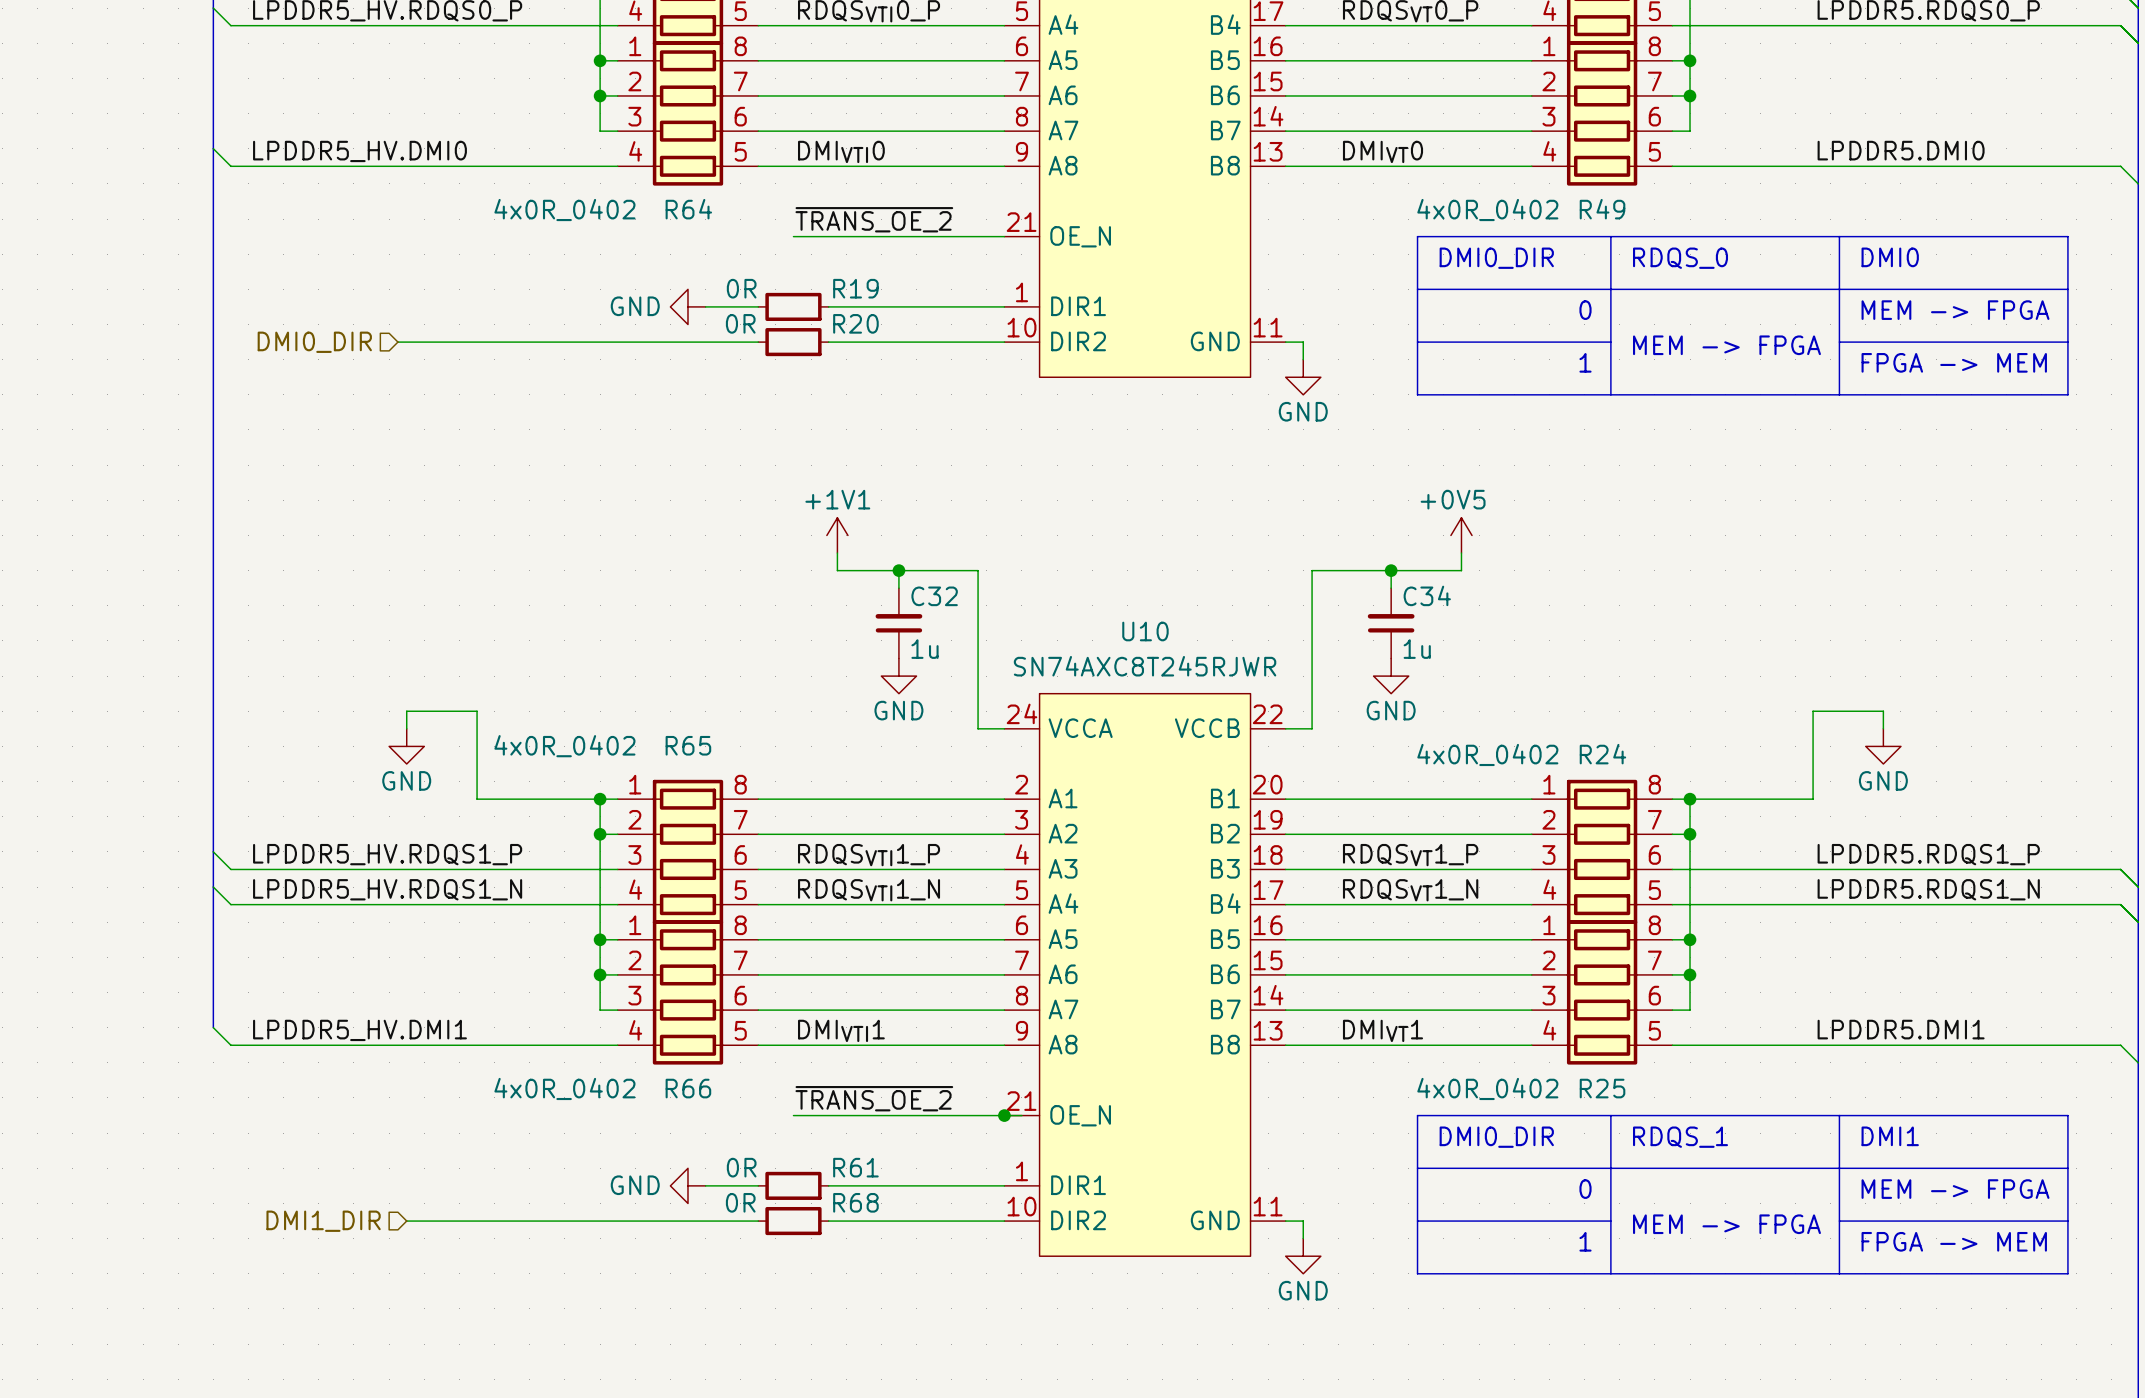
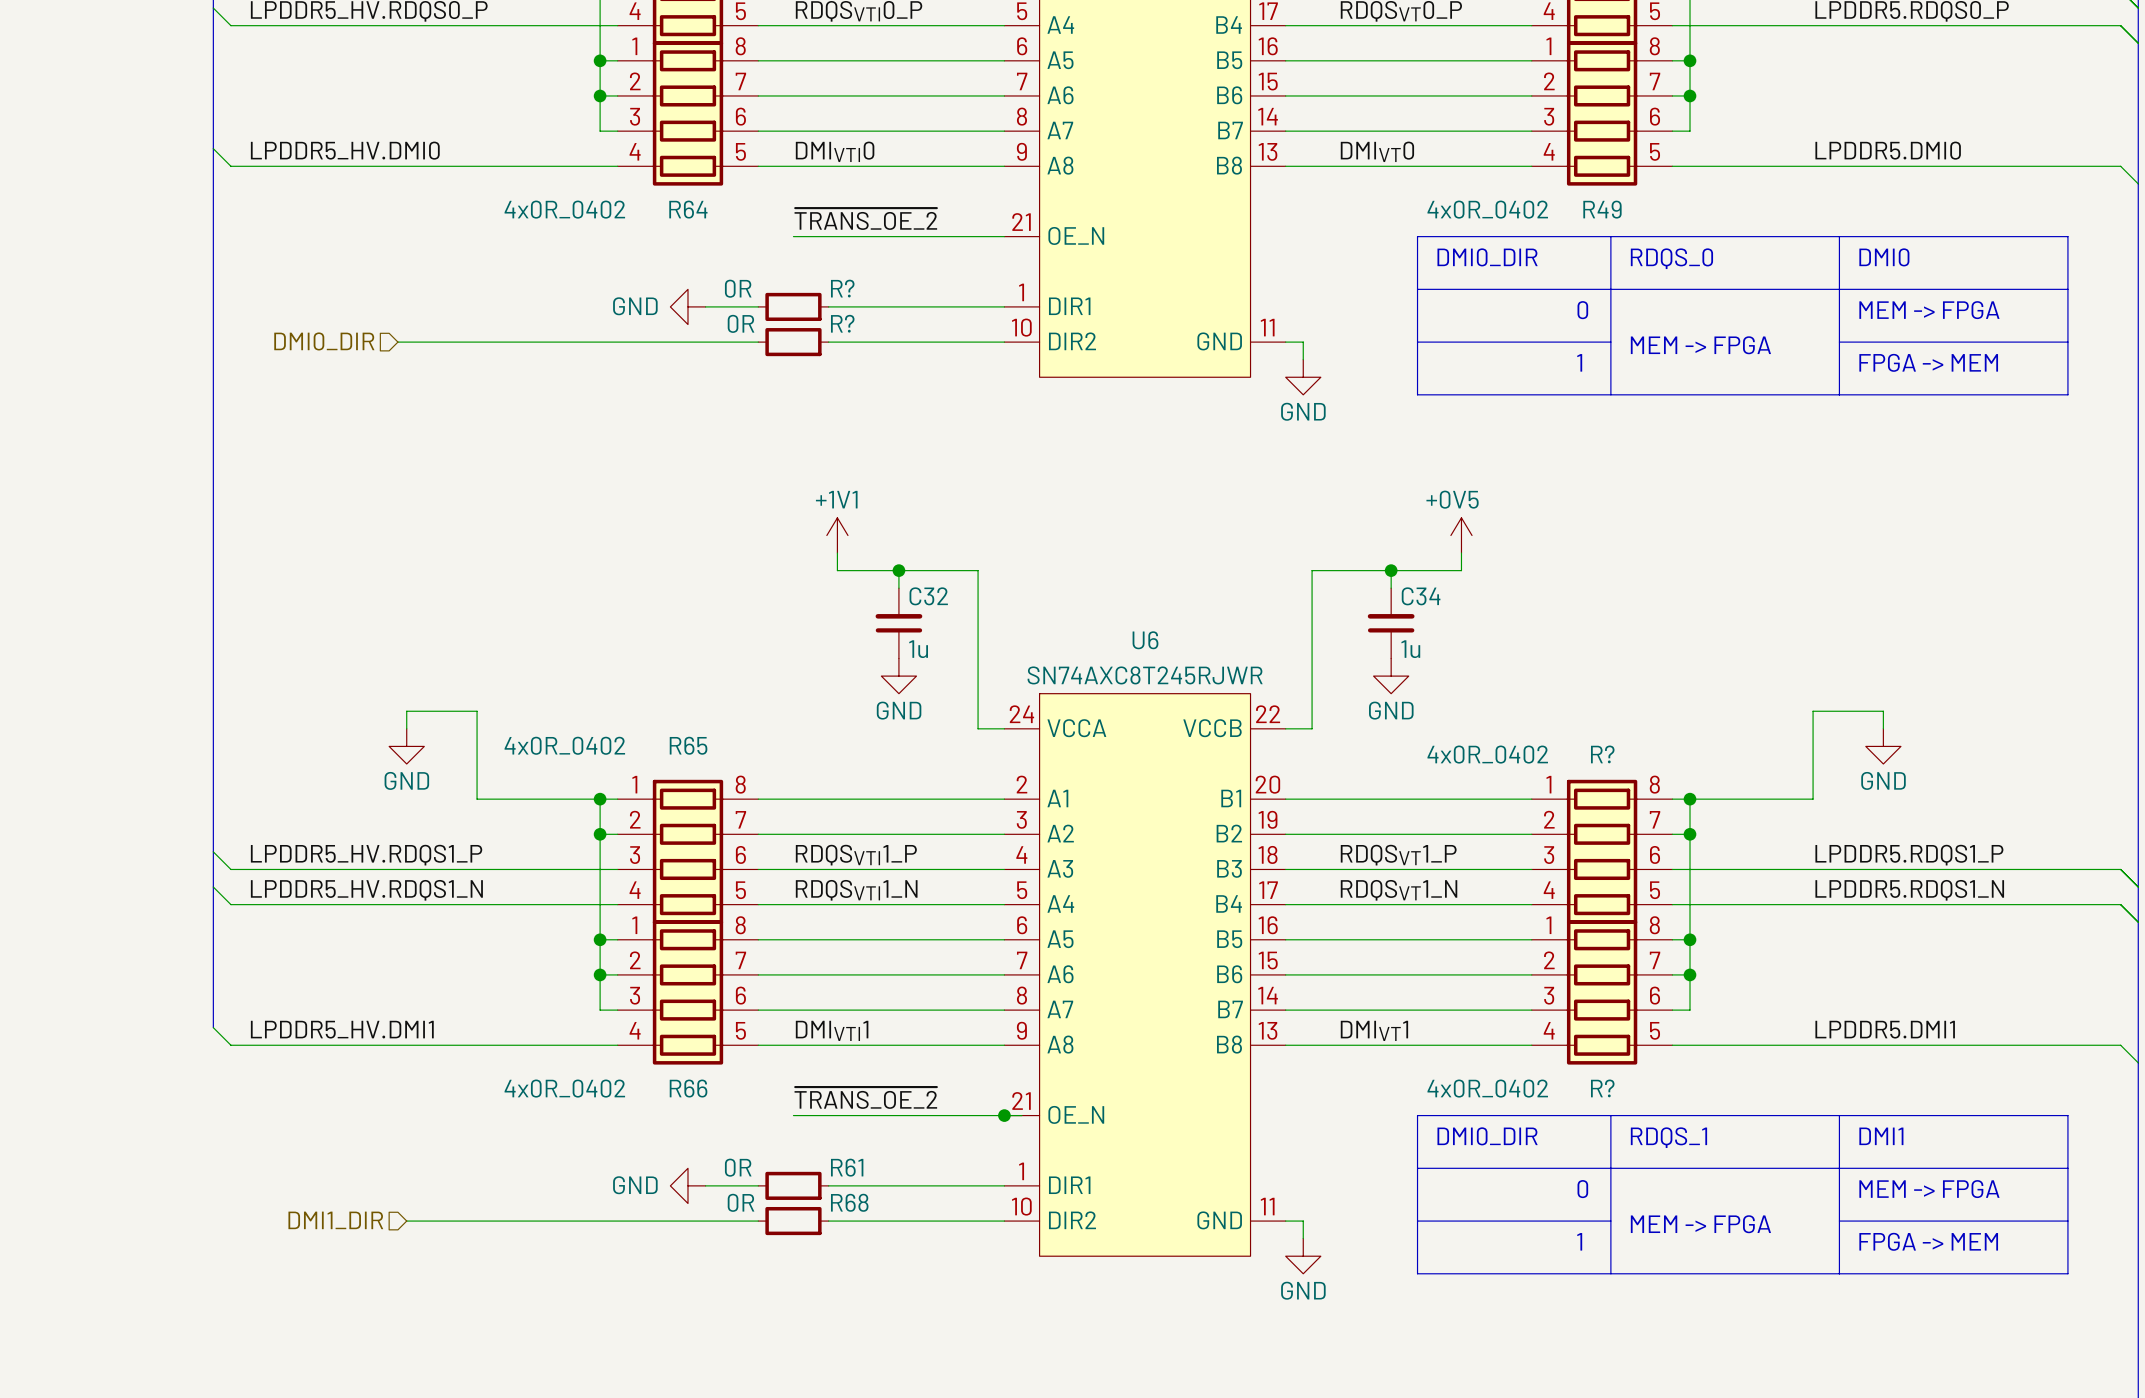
R19 name: R19 (855, 288) -> R? (842, 288)
R20 name: R20 (855, 323) -> R? (842, 323)
U10 name: U10 (1145, 631) -> U6 (1145, 640)
U10 text: SN74AXC8T245RJWR (1145, 666) -> none
U10 value: none -> SN74AXC8T245RJWR (1145, 675)
R24 name: R24 (1602, 754) -> R? (1602, 754)
R25 name: R25 (1602, 1088) -> R? (1602, 1088)

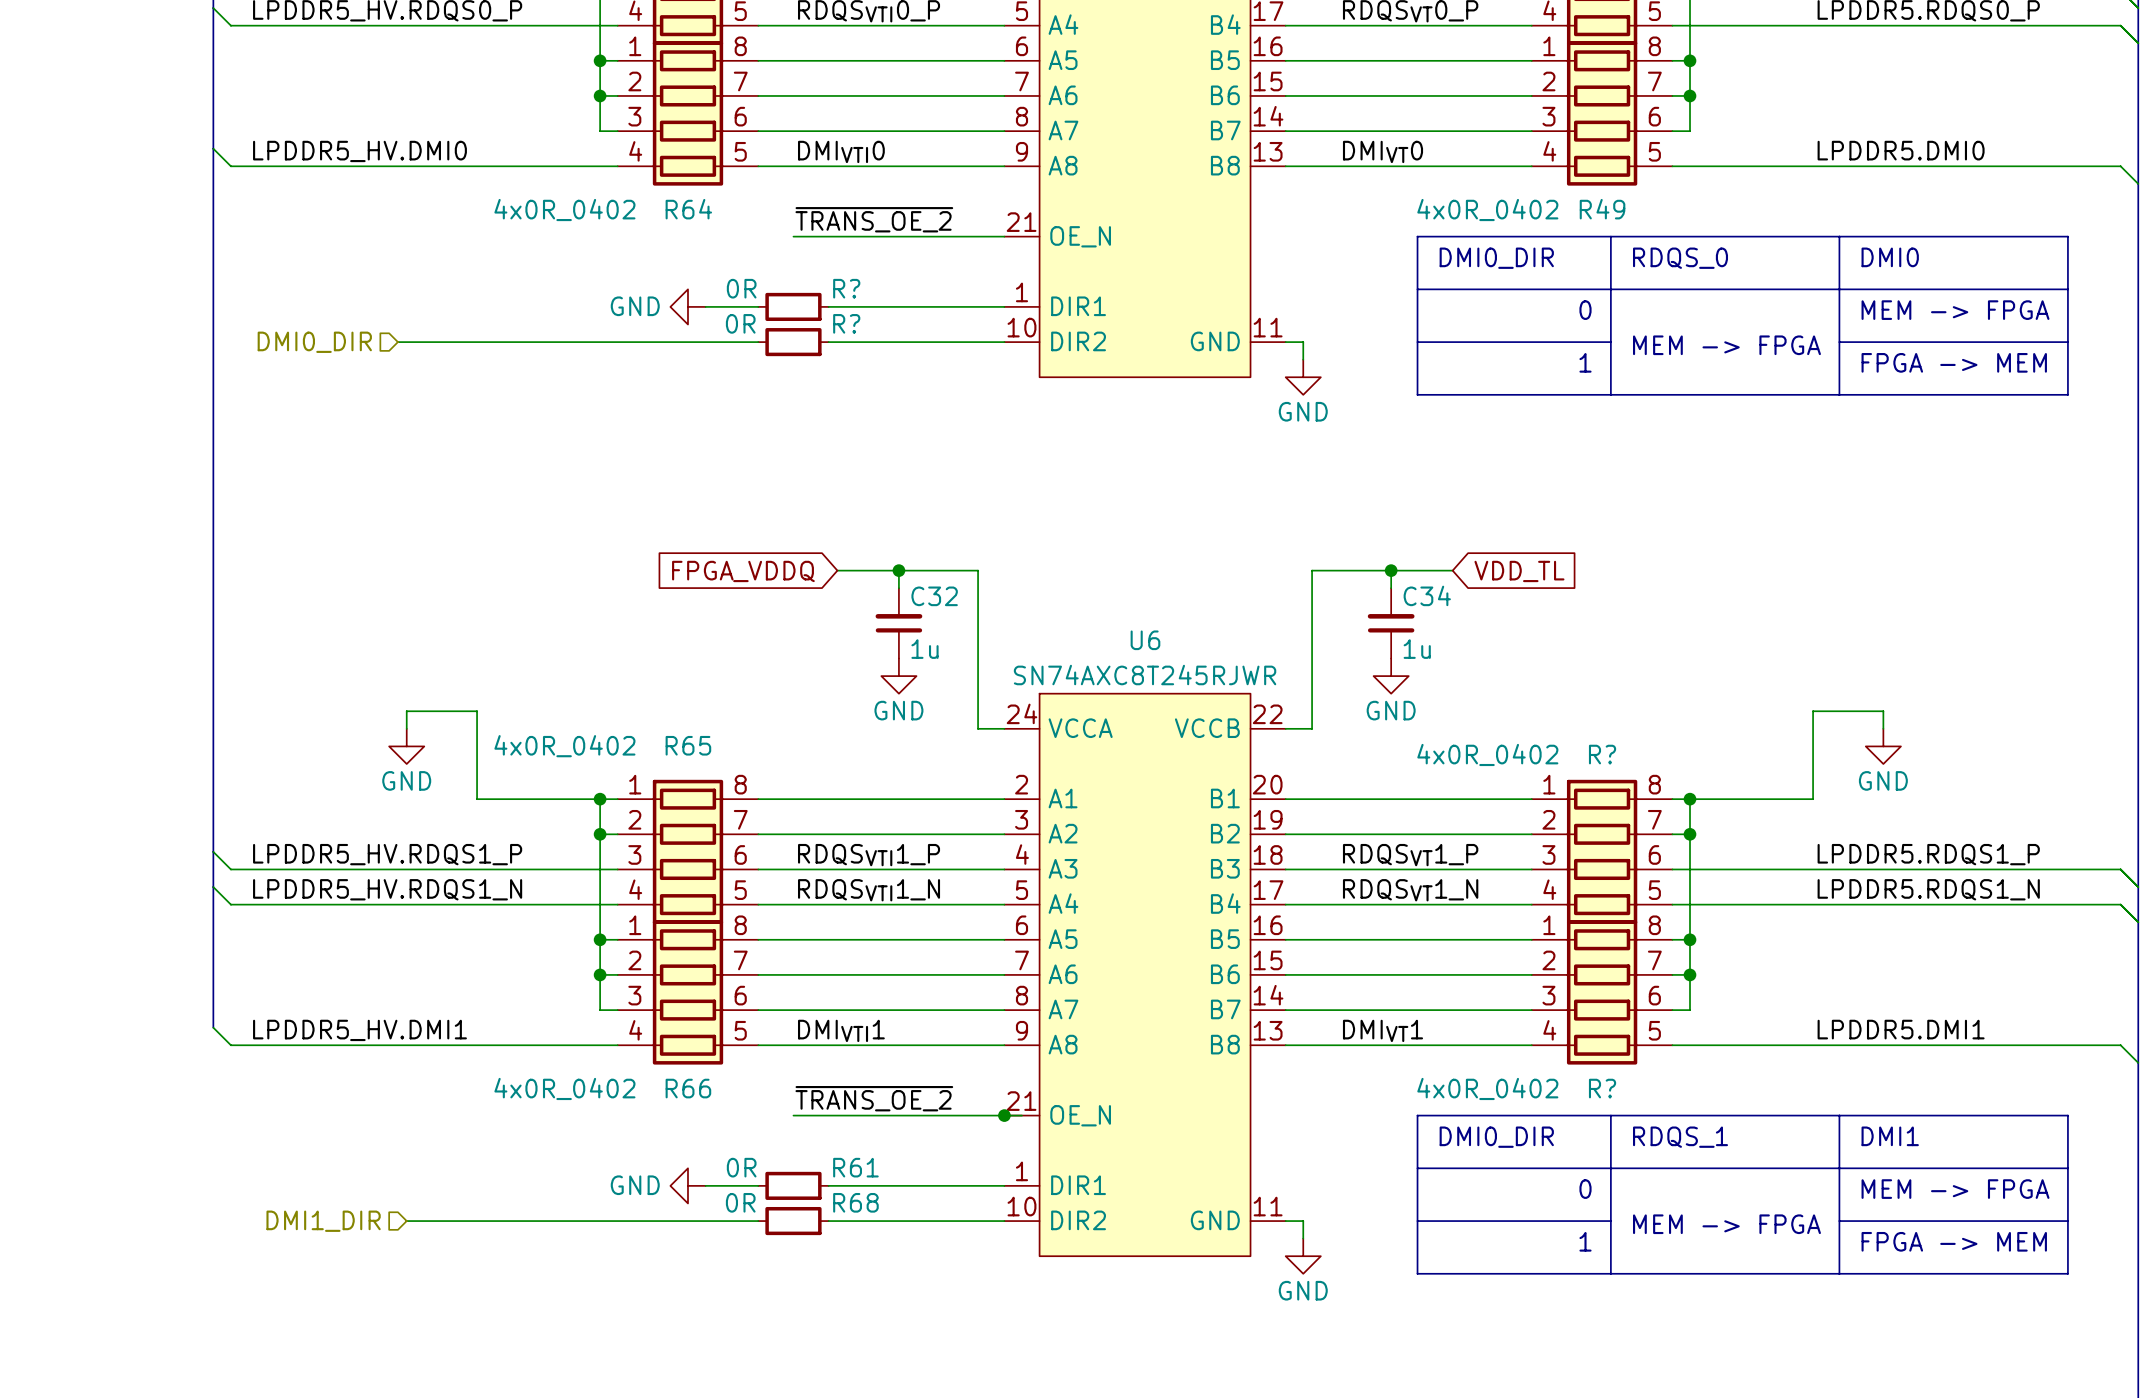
power symbol: +1V1 (837, 535) -> none
power symbol: +0V5 (1461, 535) -> none
wire: (837, 553) (837, 570) -> none
wire: (1461, 553) (1461, 570) (1452, 570) -> none
global label: none -> VDD_TL (1519, 571)
global label: none -> FPGA_VDDQ (743, 571)

